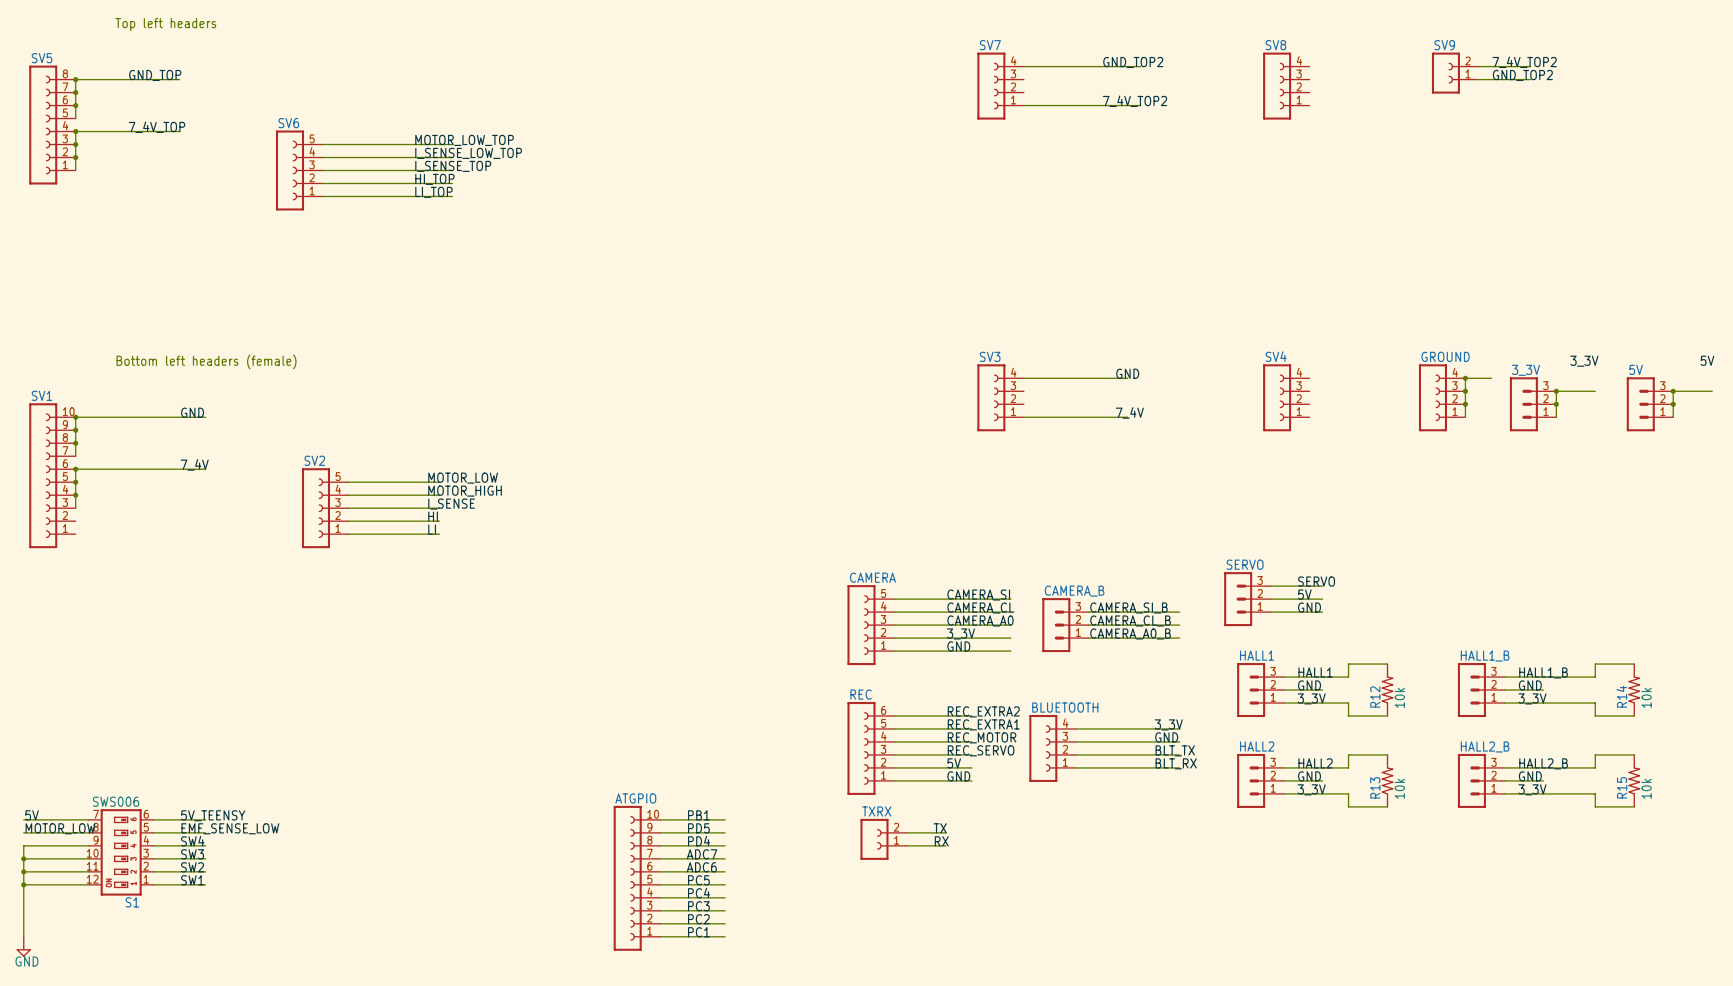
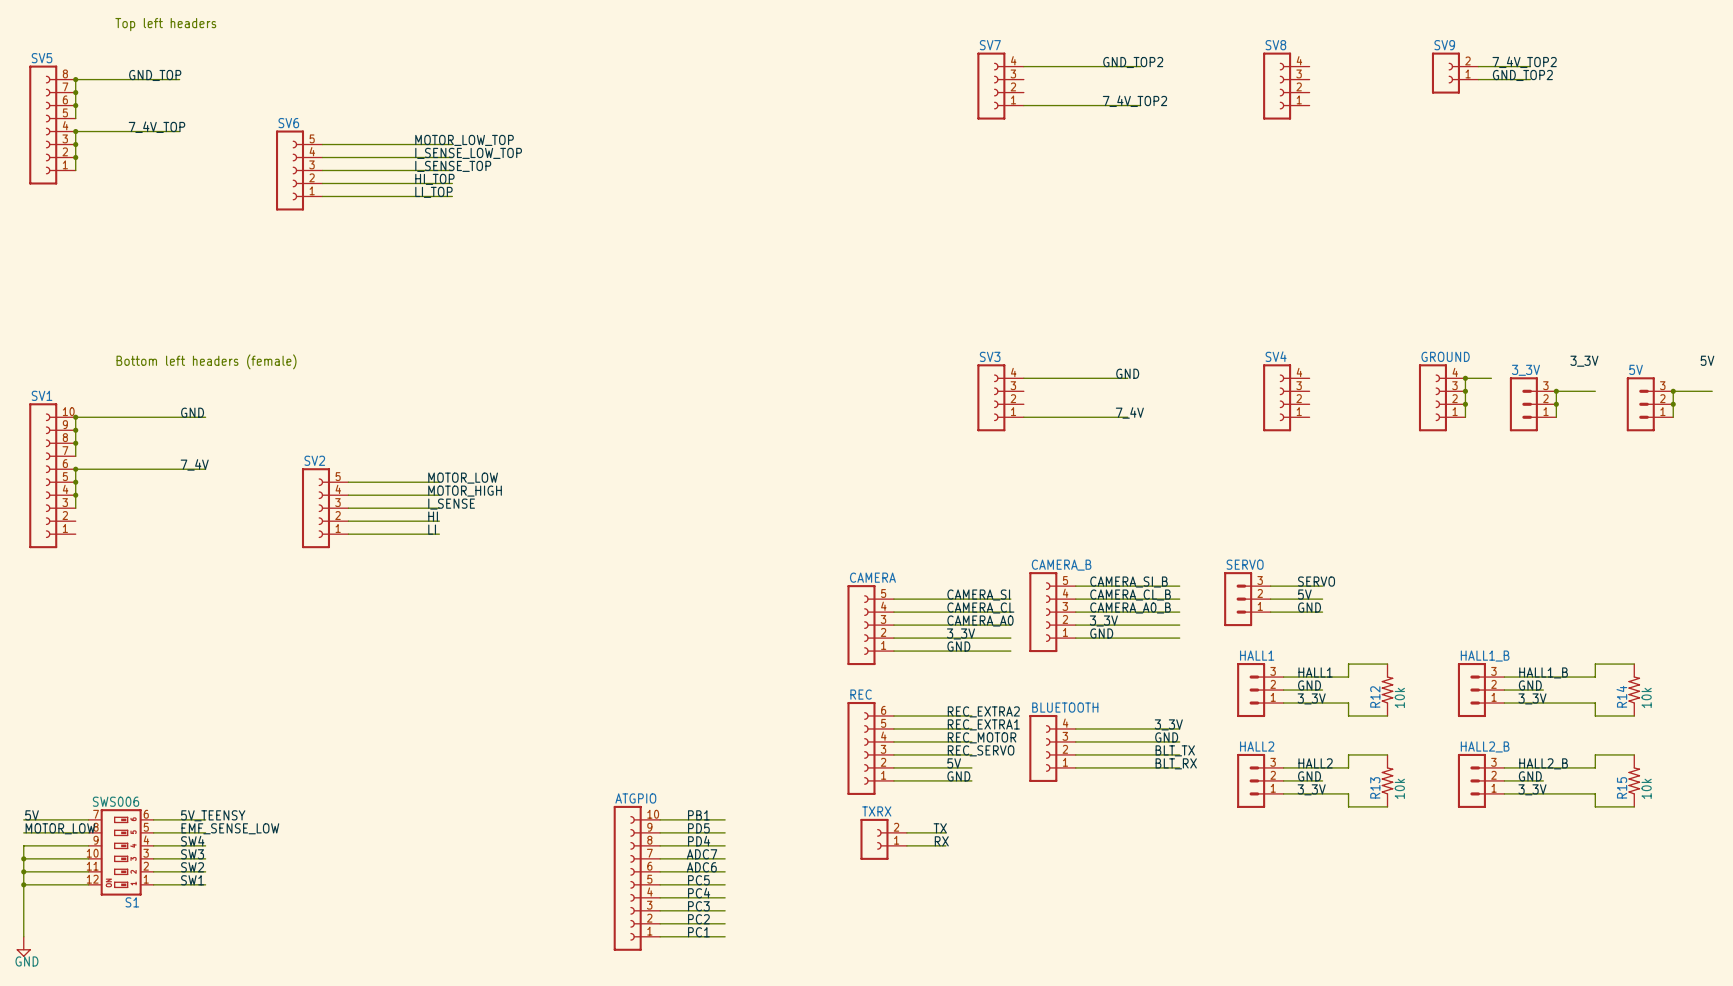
label: none -> CAMERA_SI_B (1129, 582)
wire: none -> (1075, 586) (1179, 586)
label: none -> CAMERA_CL_B (1130, 594)
wire: none -> (1075, 599) (1179, 599)
label: CAMERA_SI_B (1129, 607) -> CAMERA_A0_B (1130, 607)
CAMERA_B: none -> (1052, 612)
label: CAMERA_CL_B (1130, 620) -> 3_3V (1103, 620)
CAMERA_B: (1065, 625) -> none
label: CAMERA_A0_B (1130, 633) -> GND (1101, 633)

